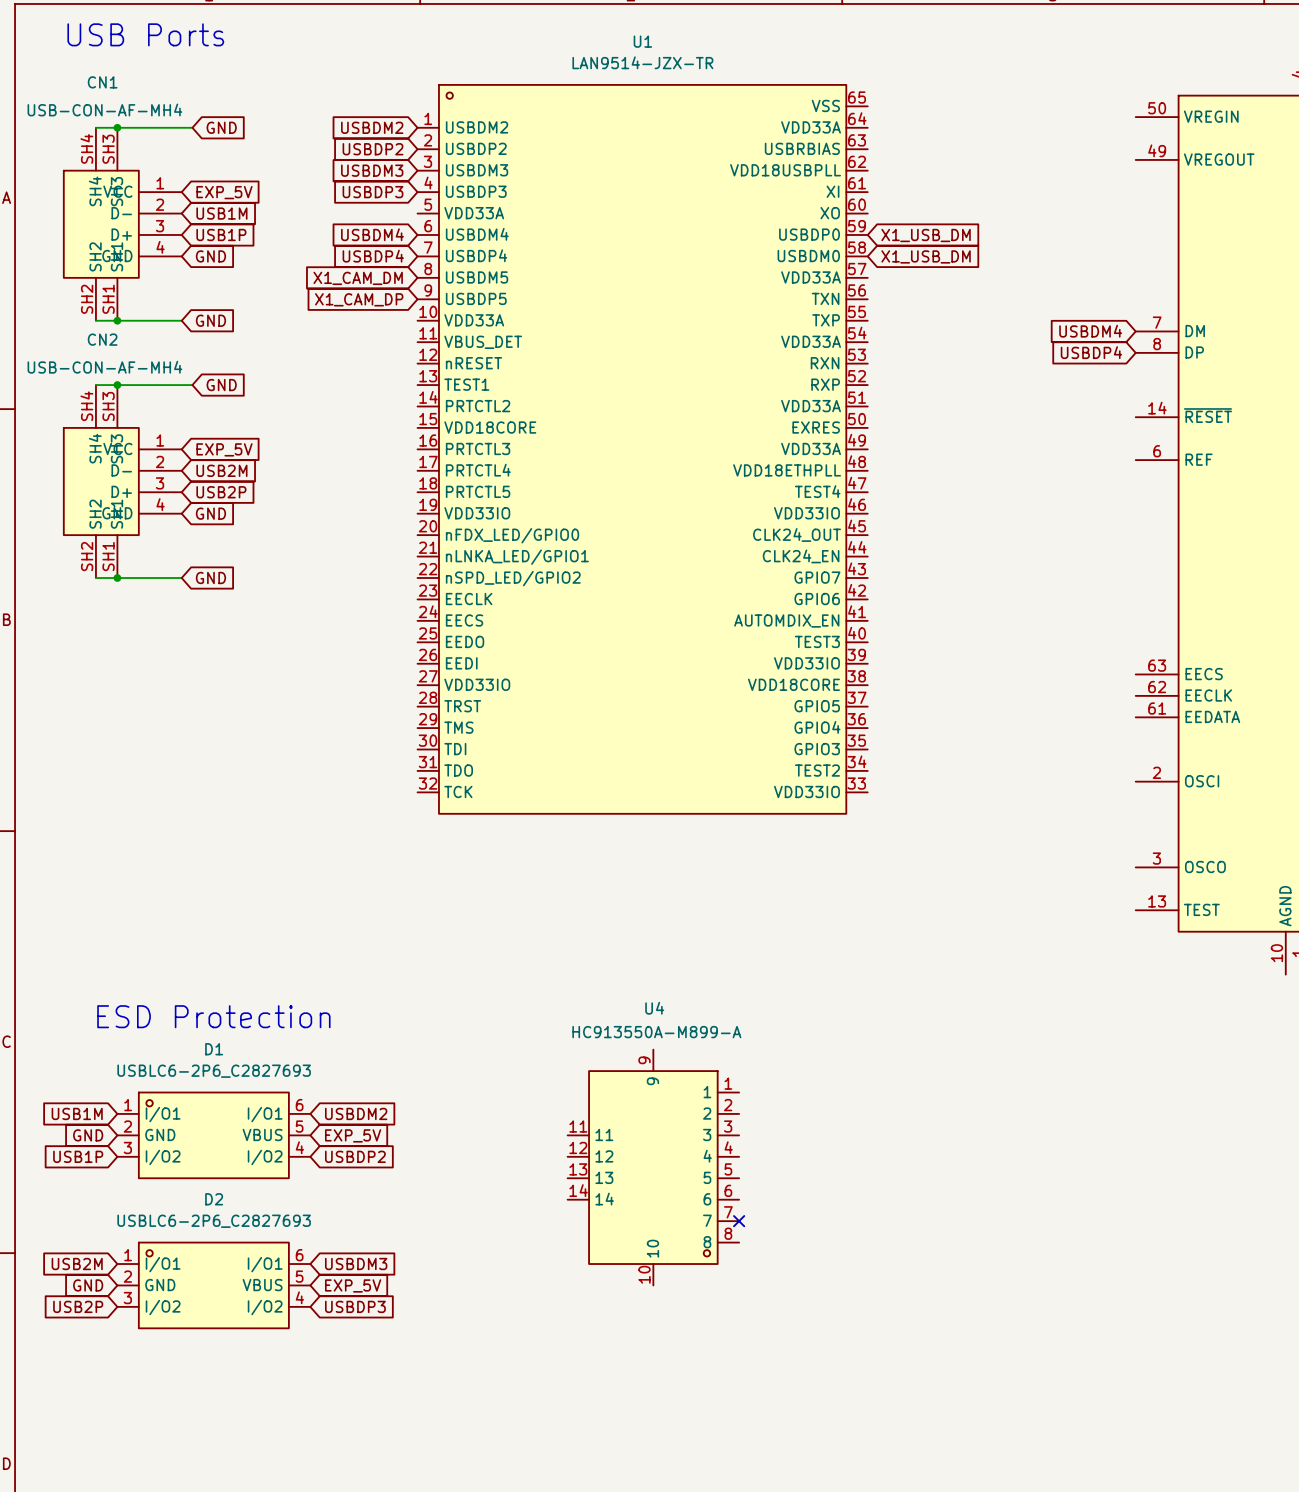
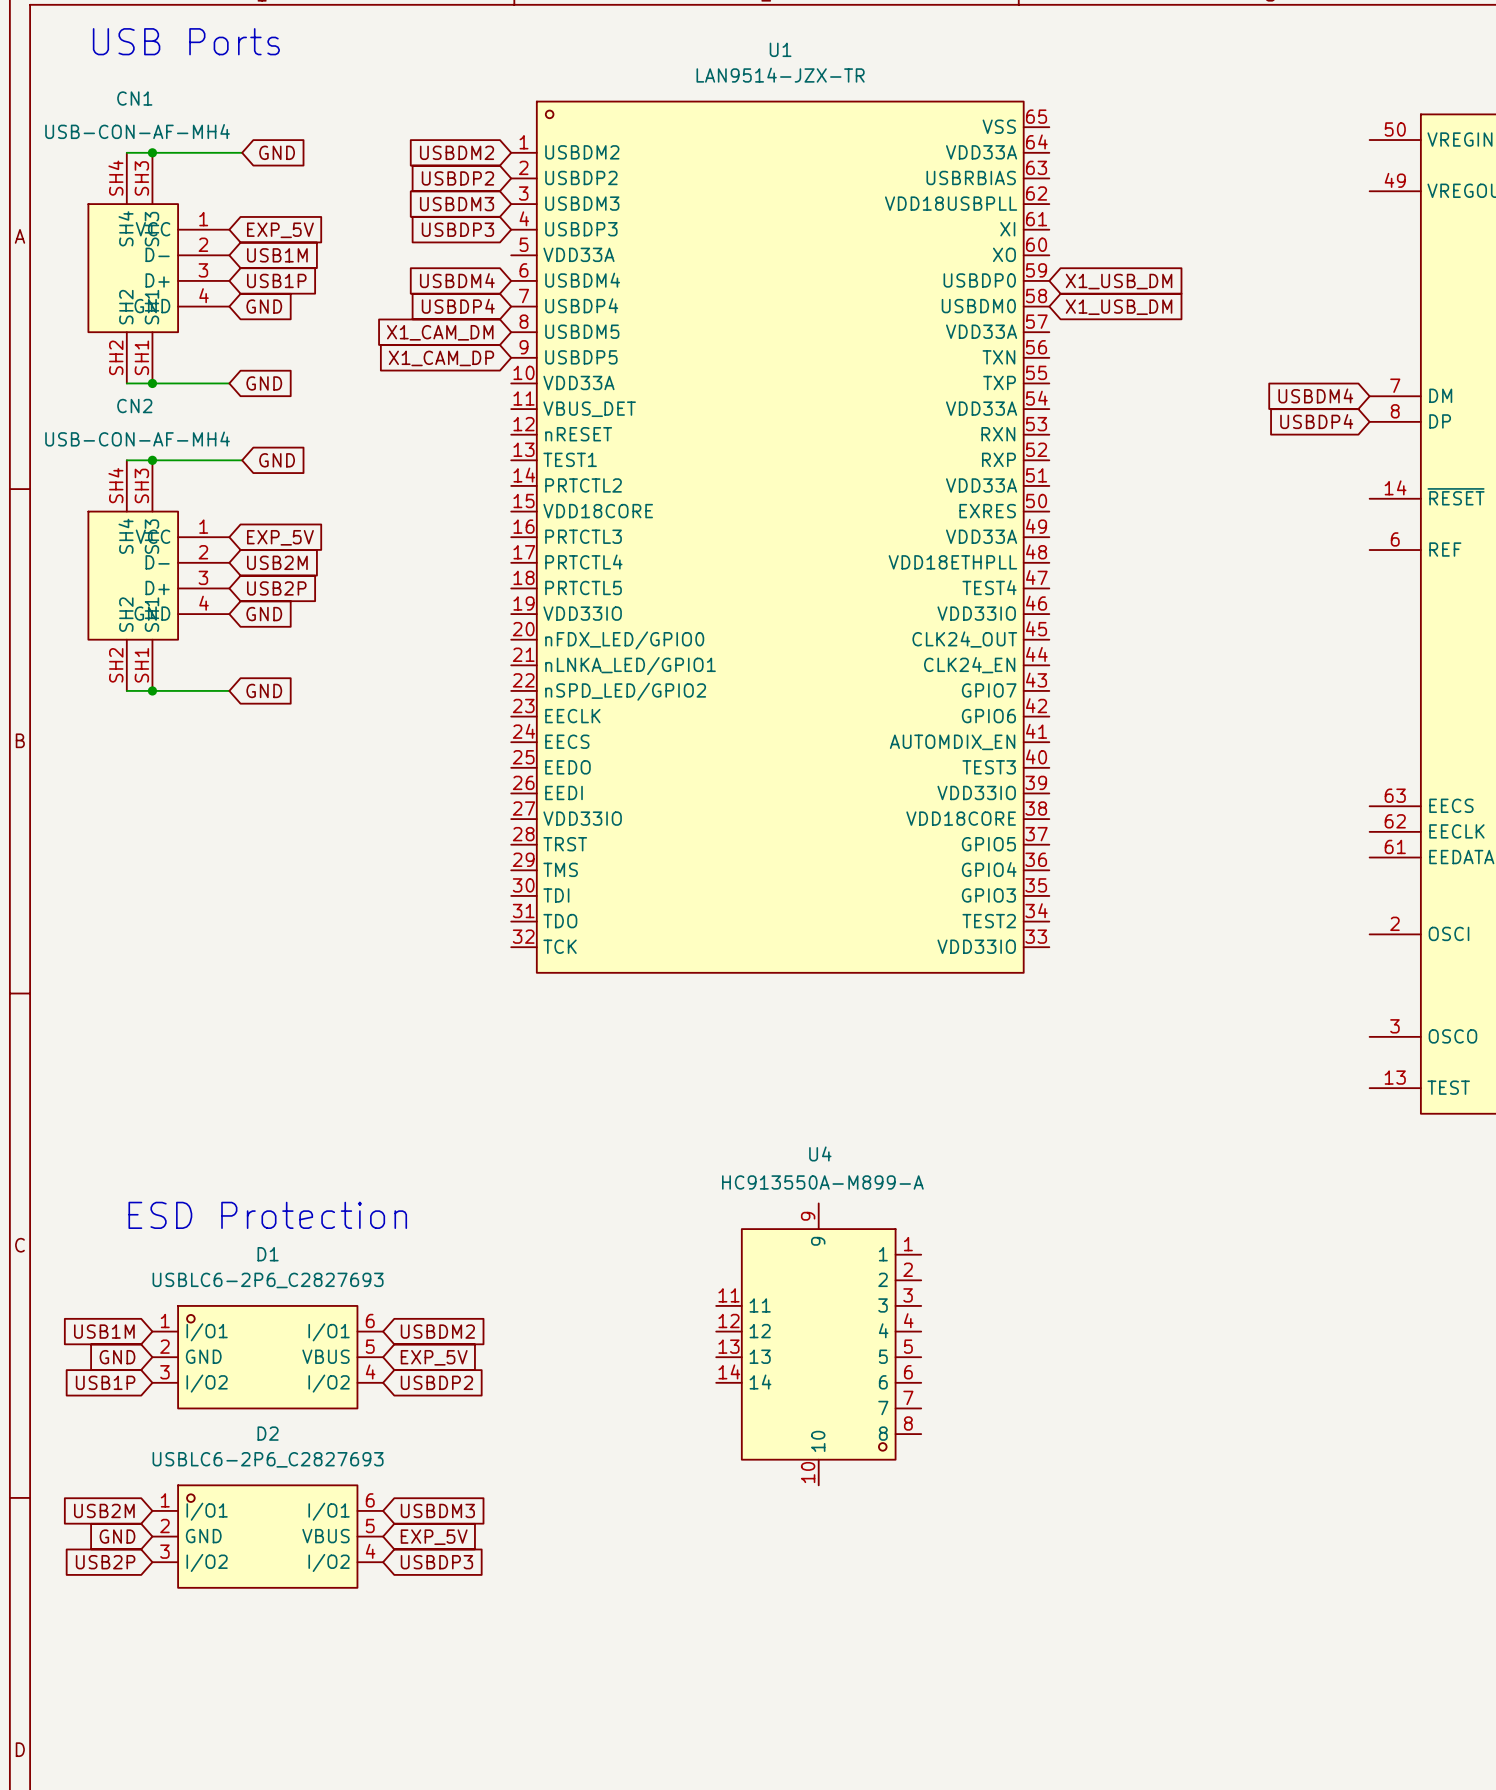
U4 position: (653, 1167) -> (818, 1344)
no-connect mark: (739, 1221) -> none

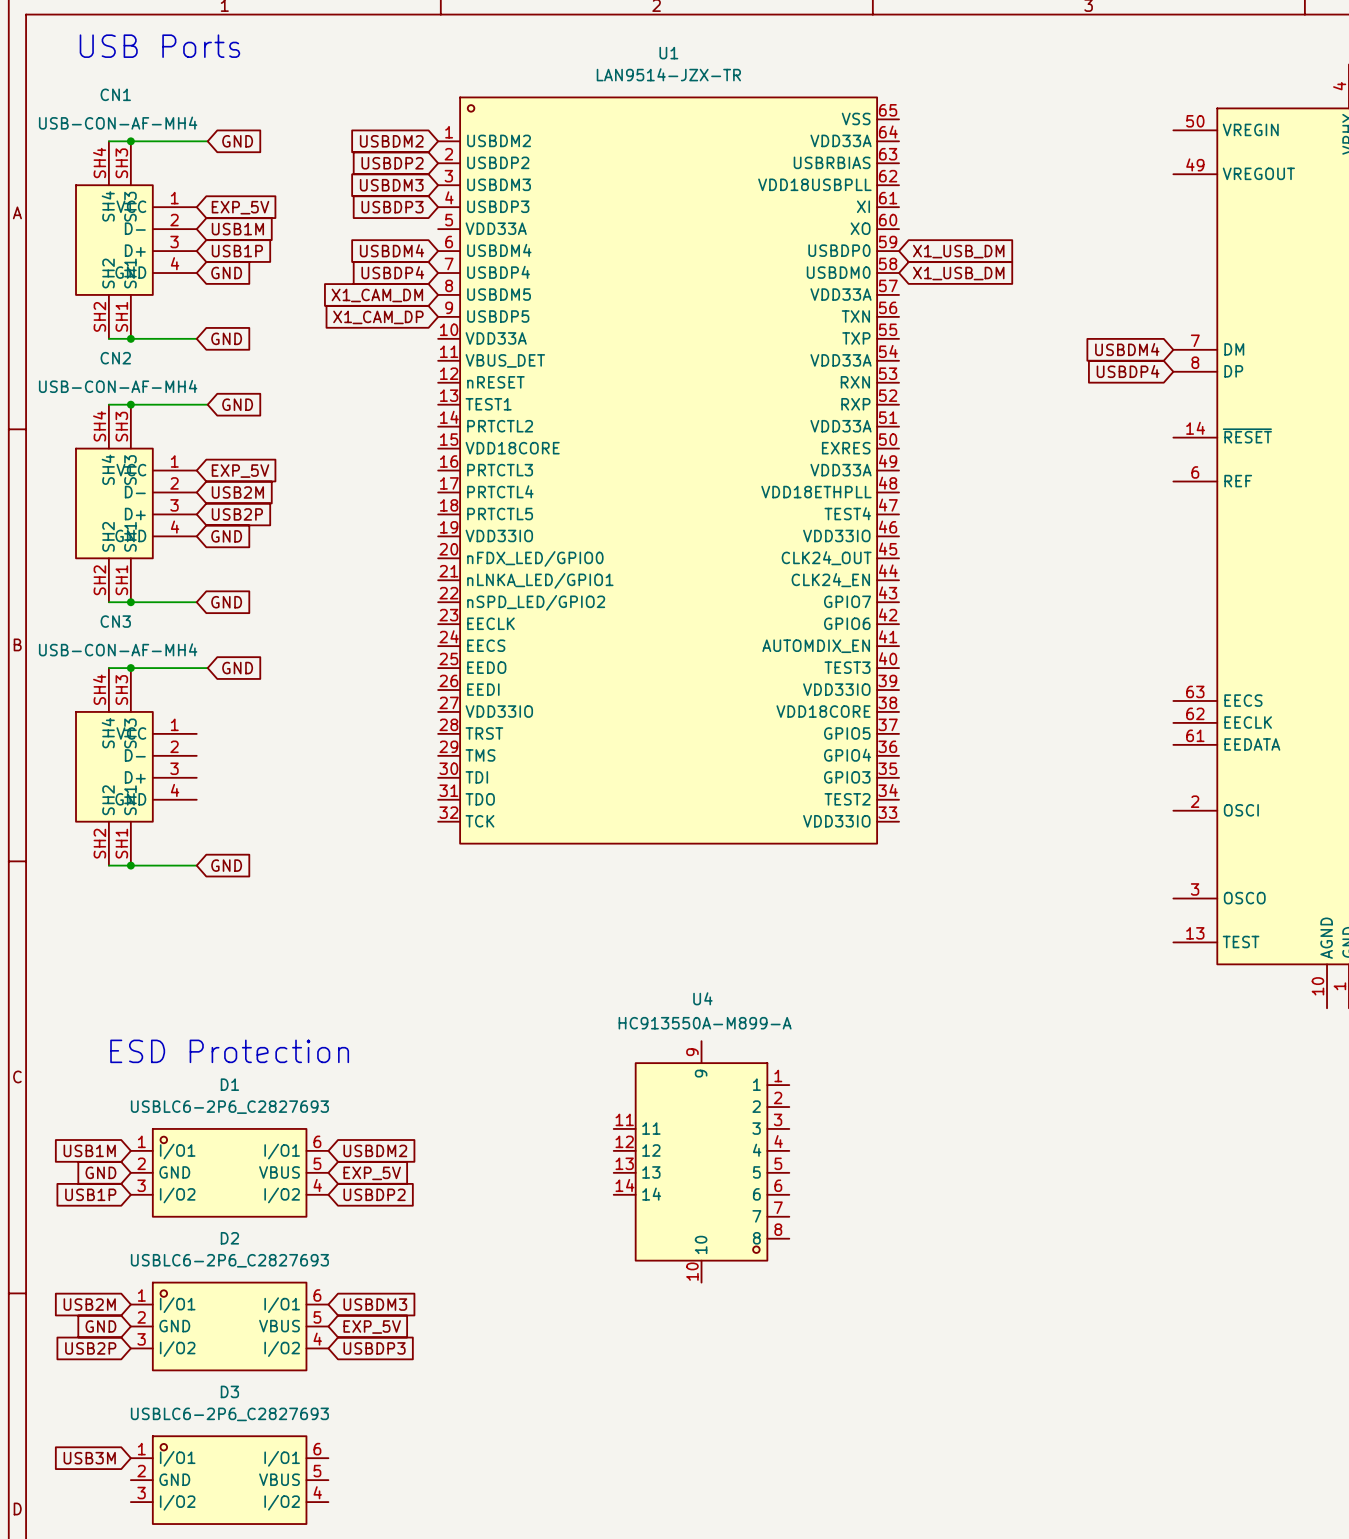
wire: none -> (108, 668) (207, 668)
junction: none -> (130, 668)
global label: none -> GND (237, 668)
CN3: none -> USB-CON-AF-MH4 (136, 766)
wire: none -> (108, 865) (196, 865)
junction: none -> (130, 865)
global label: none -> GND (226, 865)
global label: none -> USB3M (89, 1458)
D3: none -> USBLC6-2P6_C2827693 (229, 1480)

